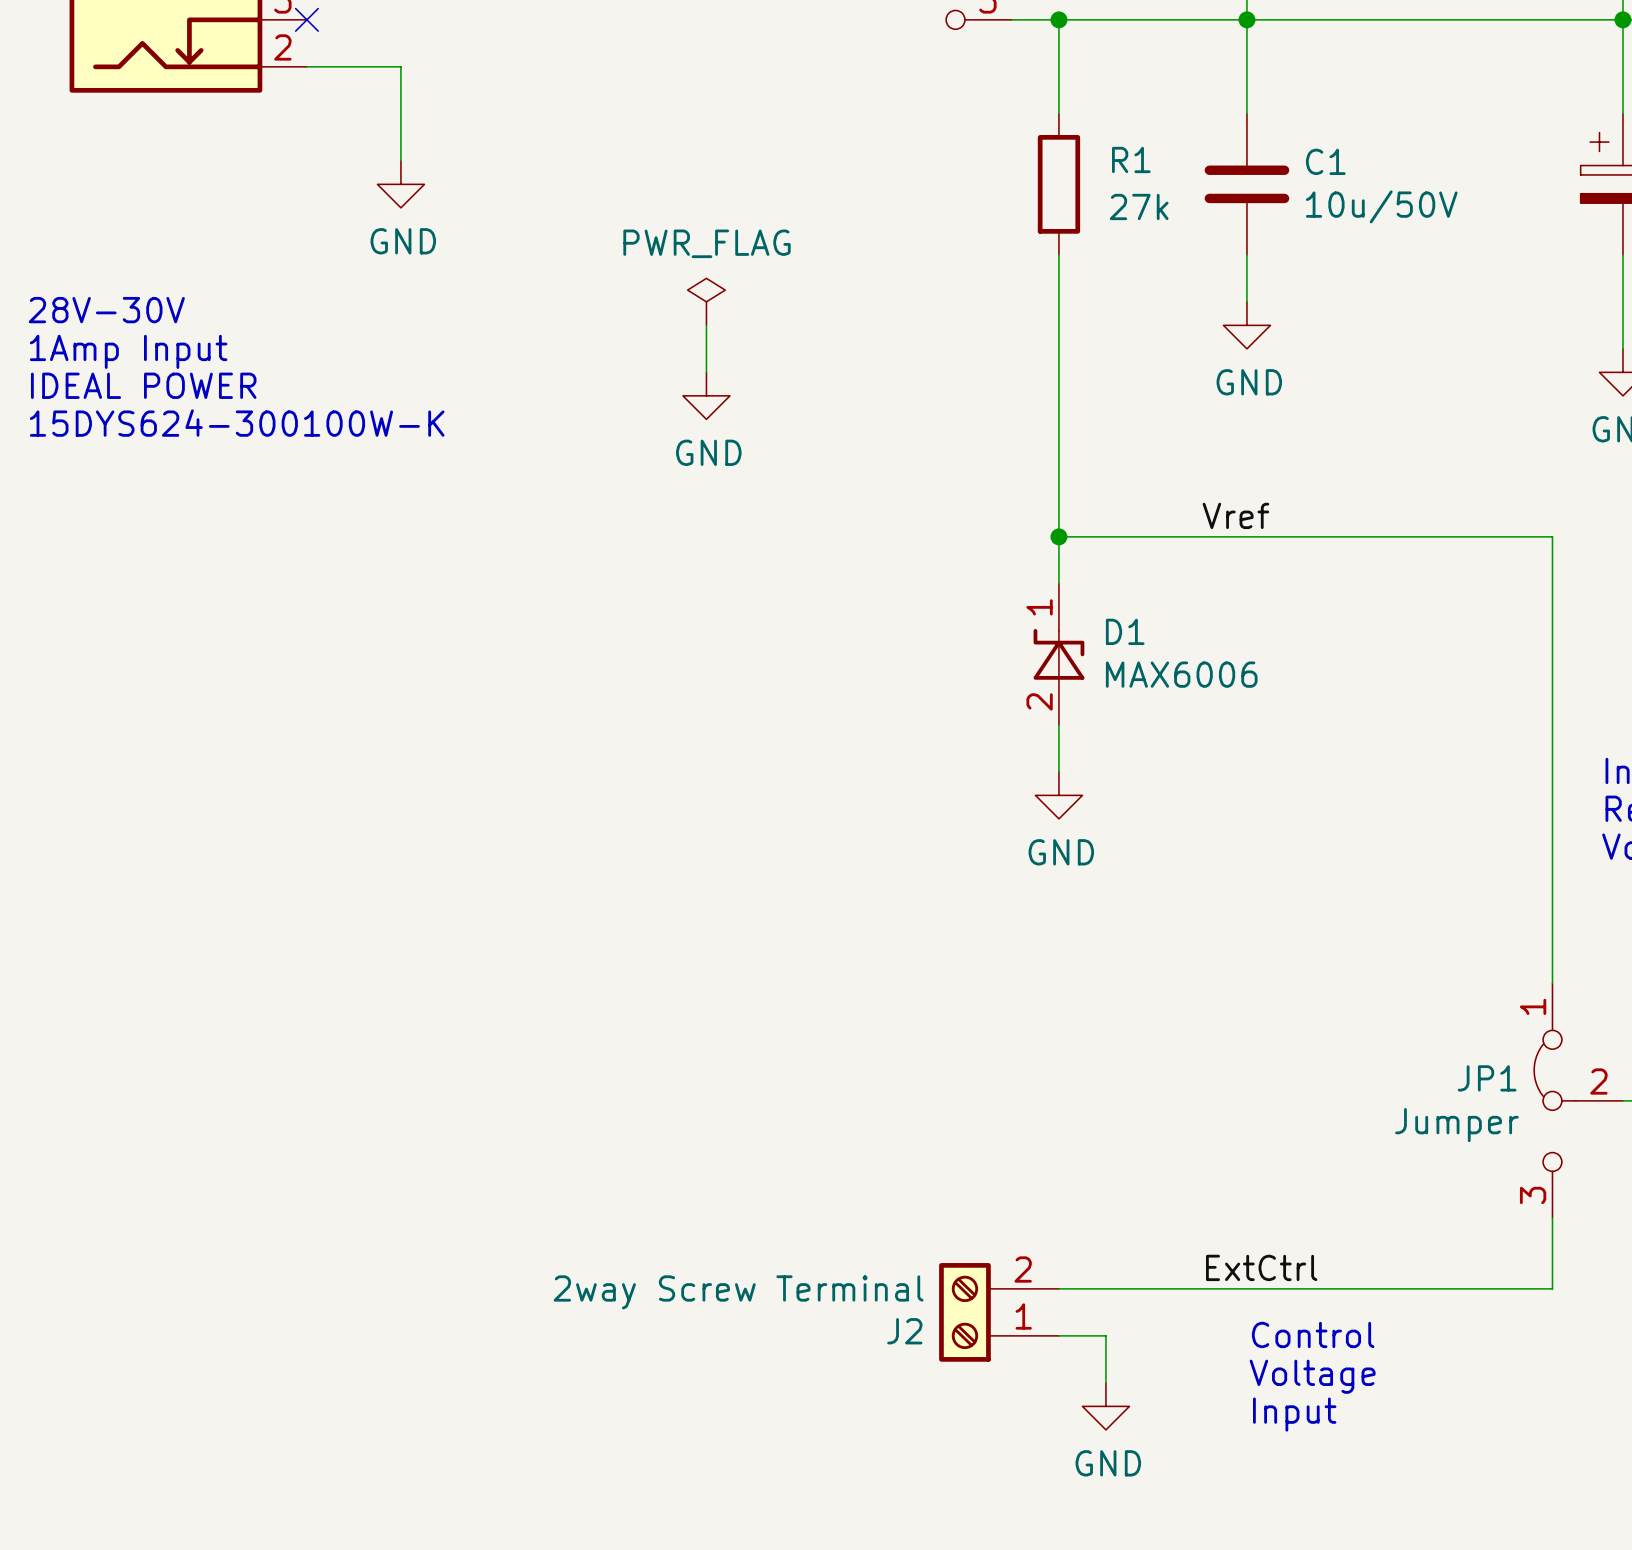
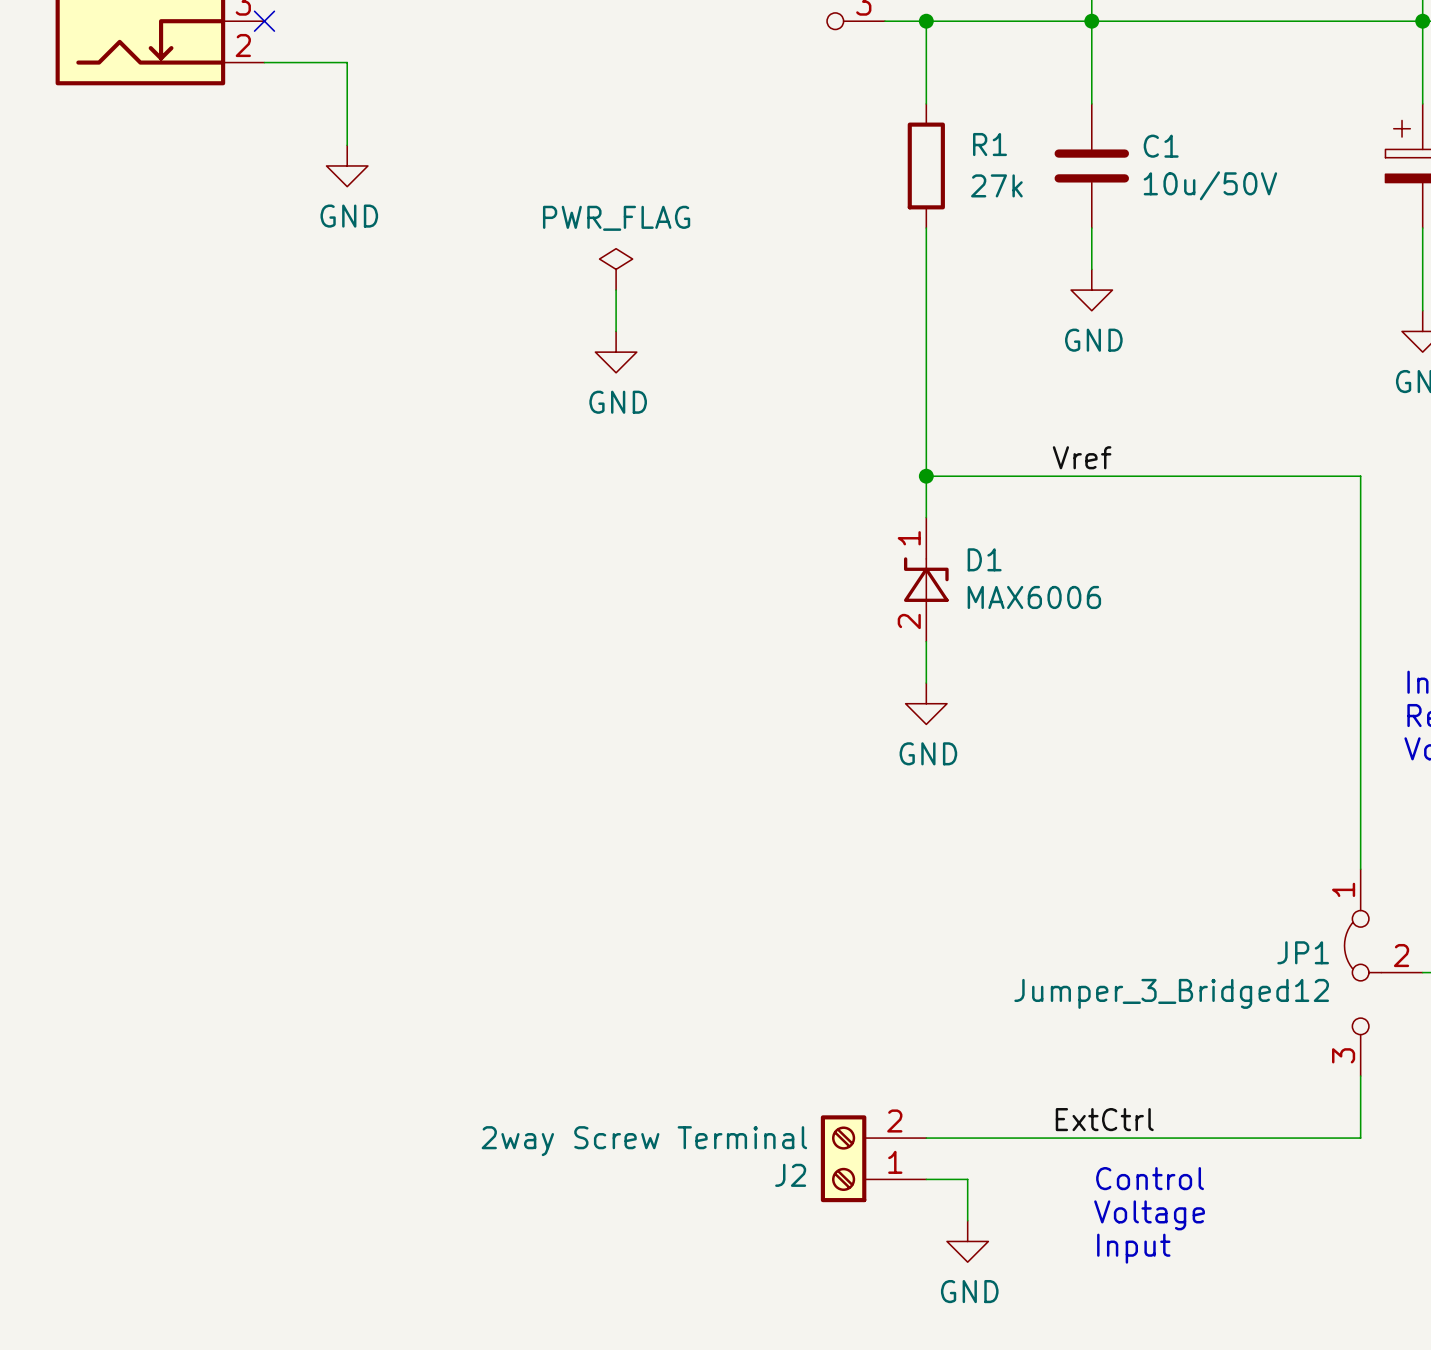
text: 28V-30V (106, 310) -> none
text: 1Amp Input (128, 351) -> none
text: IDEAL POWER (143, 385) -> none
text: 15DYS624-300100W-K (237, 423) -> none
JP1 value: Jumper (1456, 1125) -> Jumper_3_Bridged12 (1171, 993)

